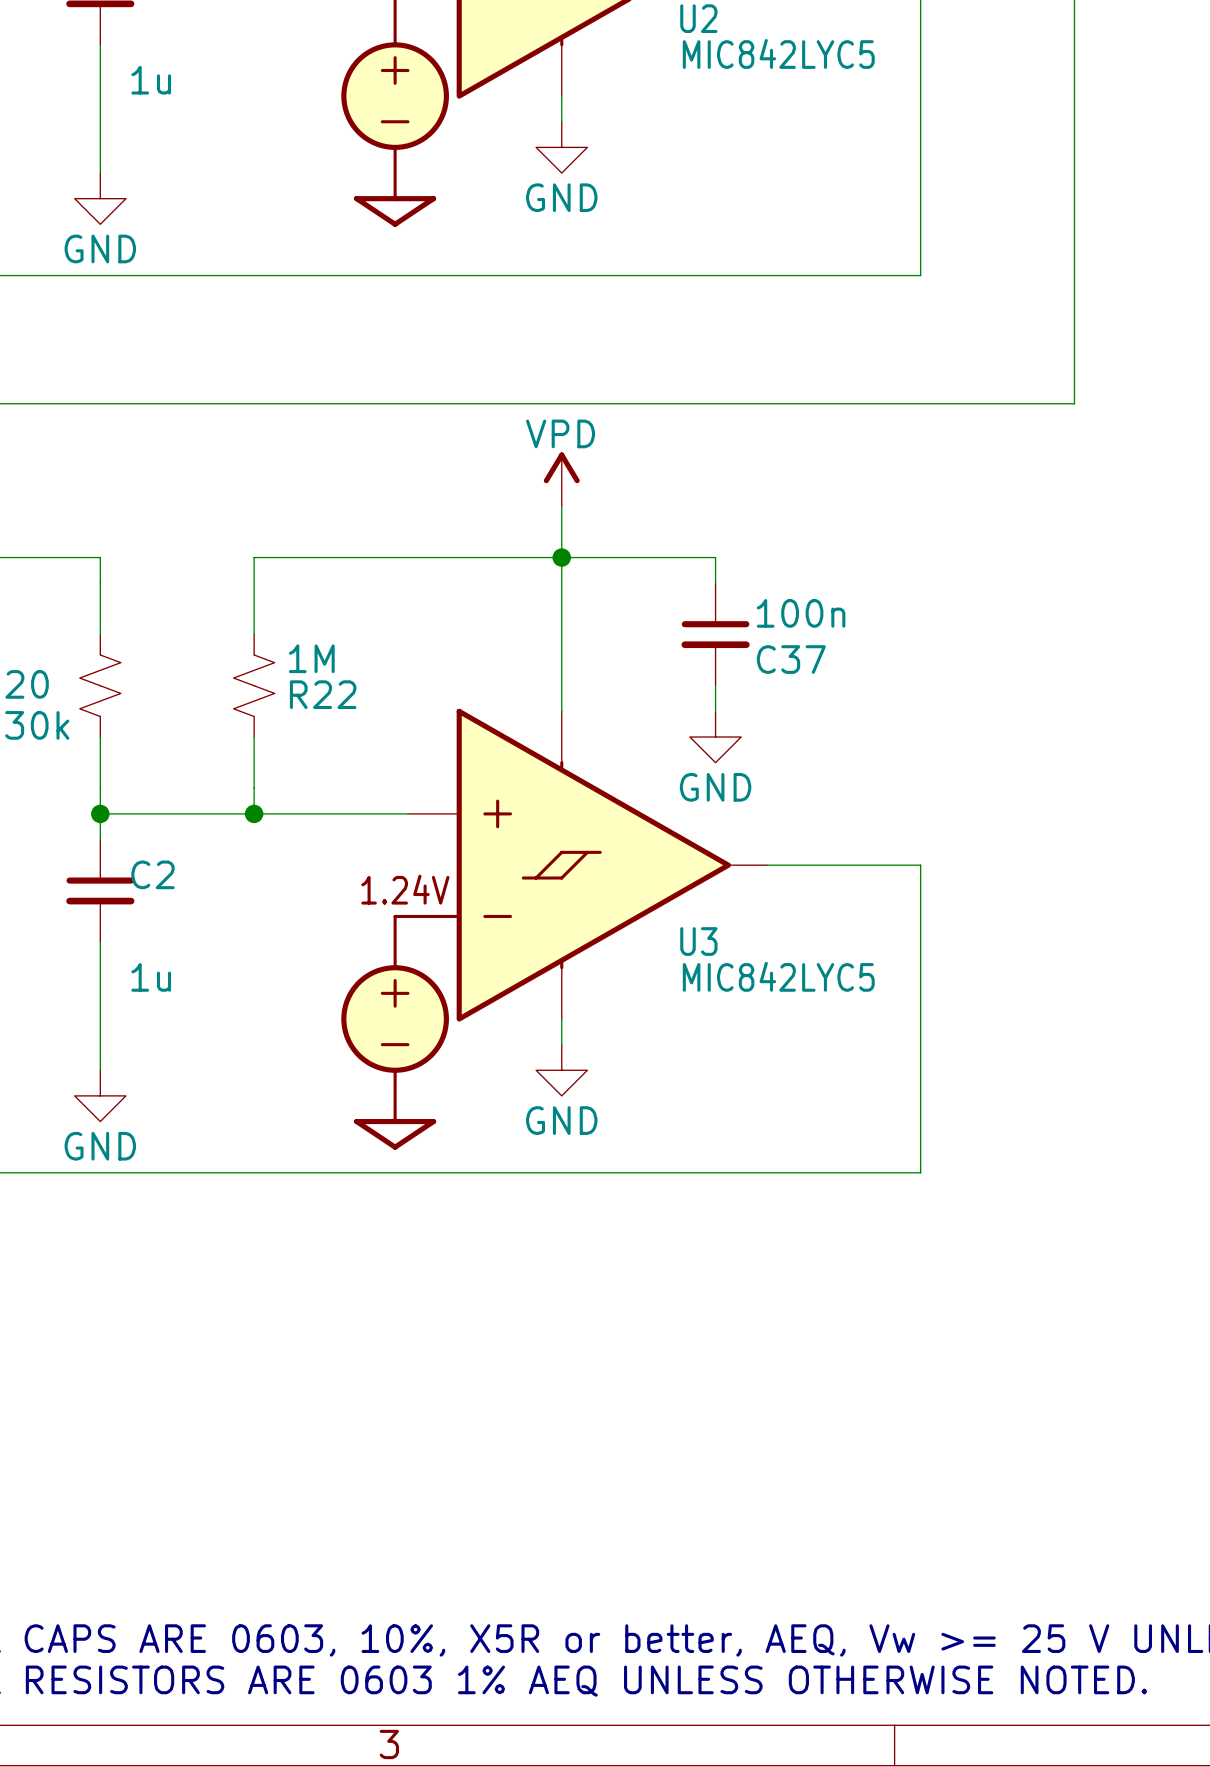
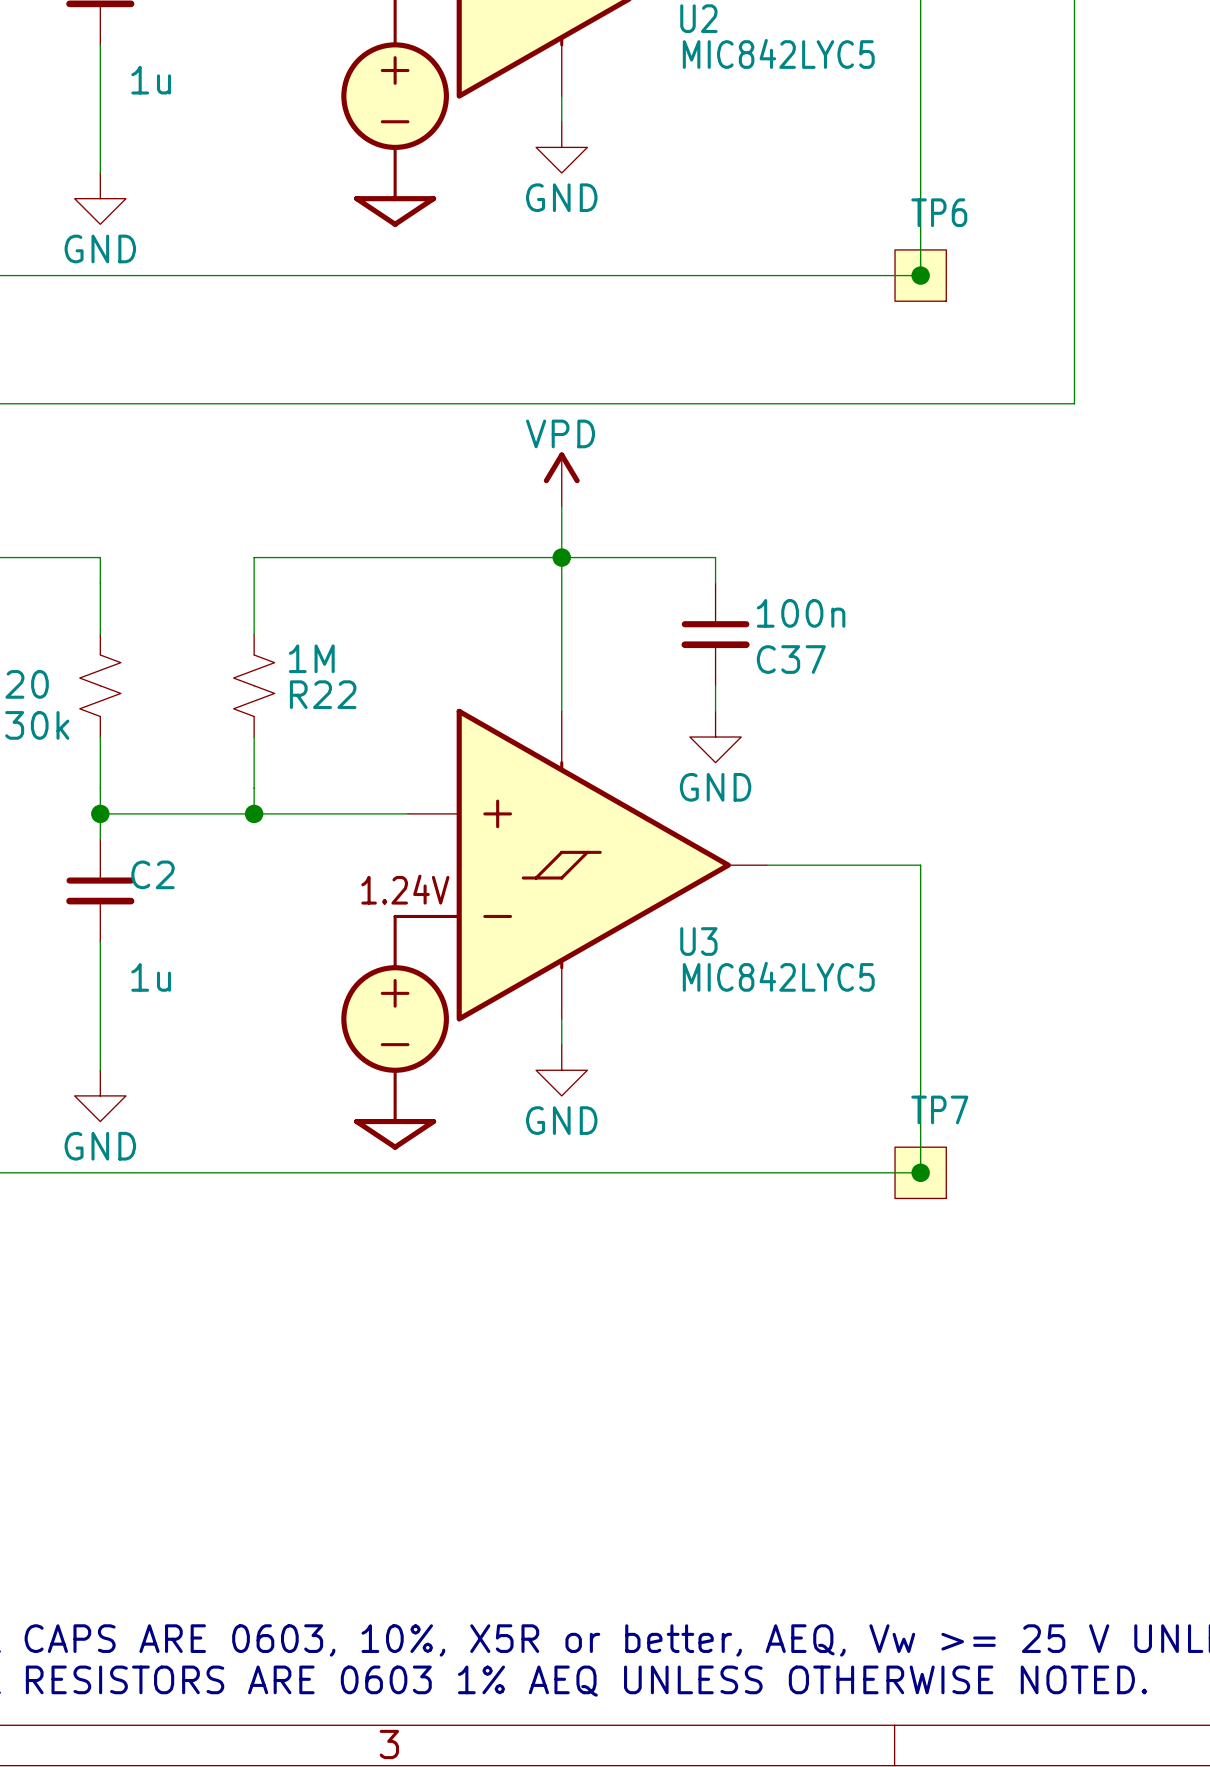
junction: none -> (920, 275)
TP6: none -> (920, 275)
junction: none -> (920, 1172)
TP7: none -> (920, 1172)

